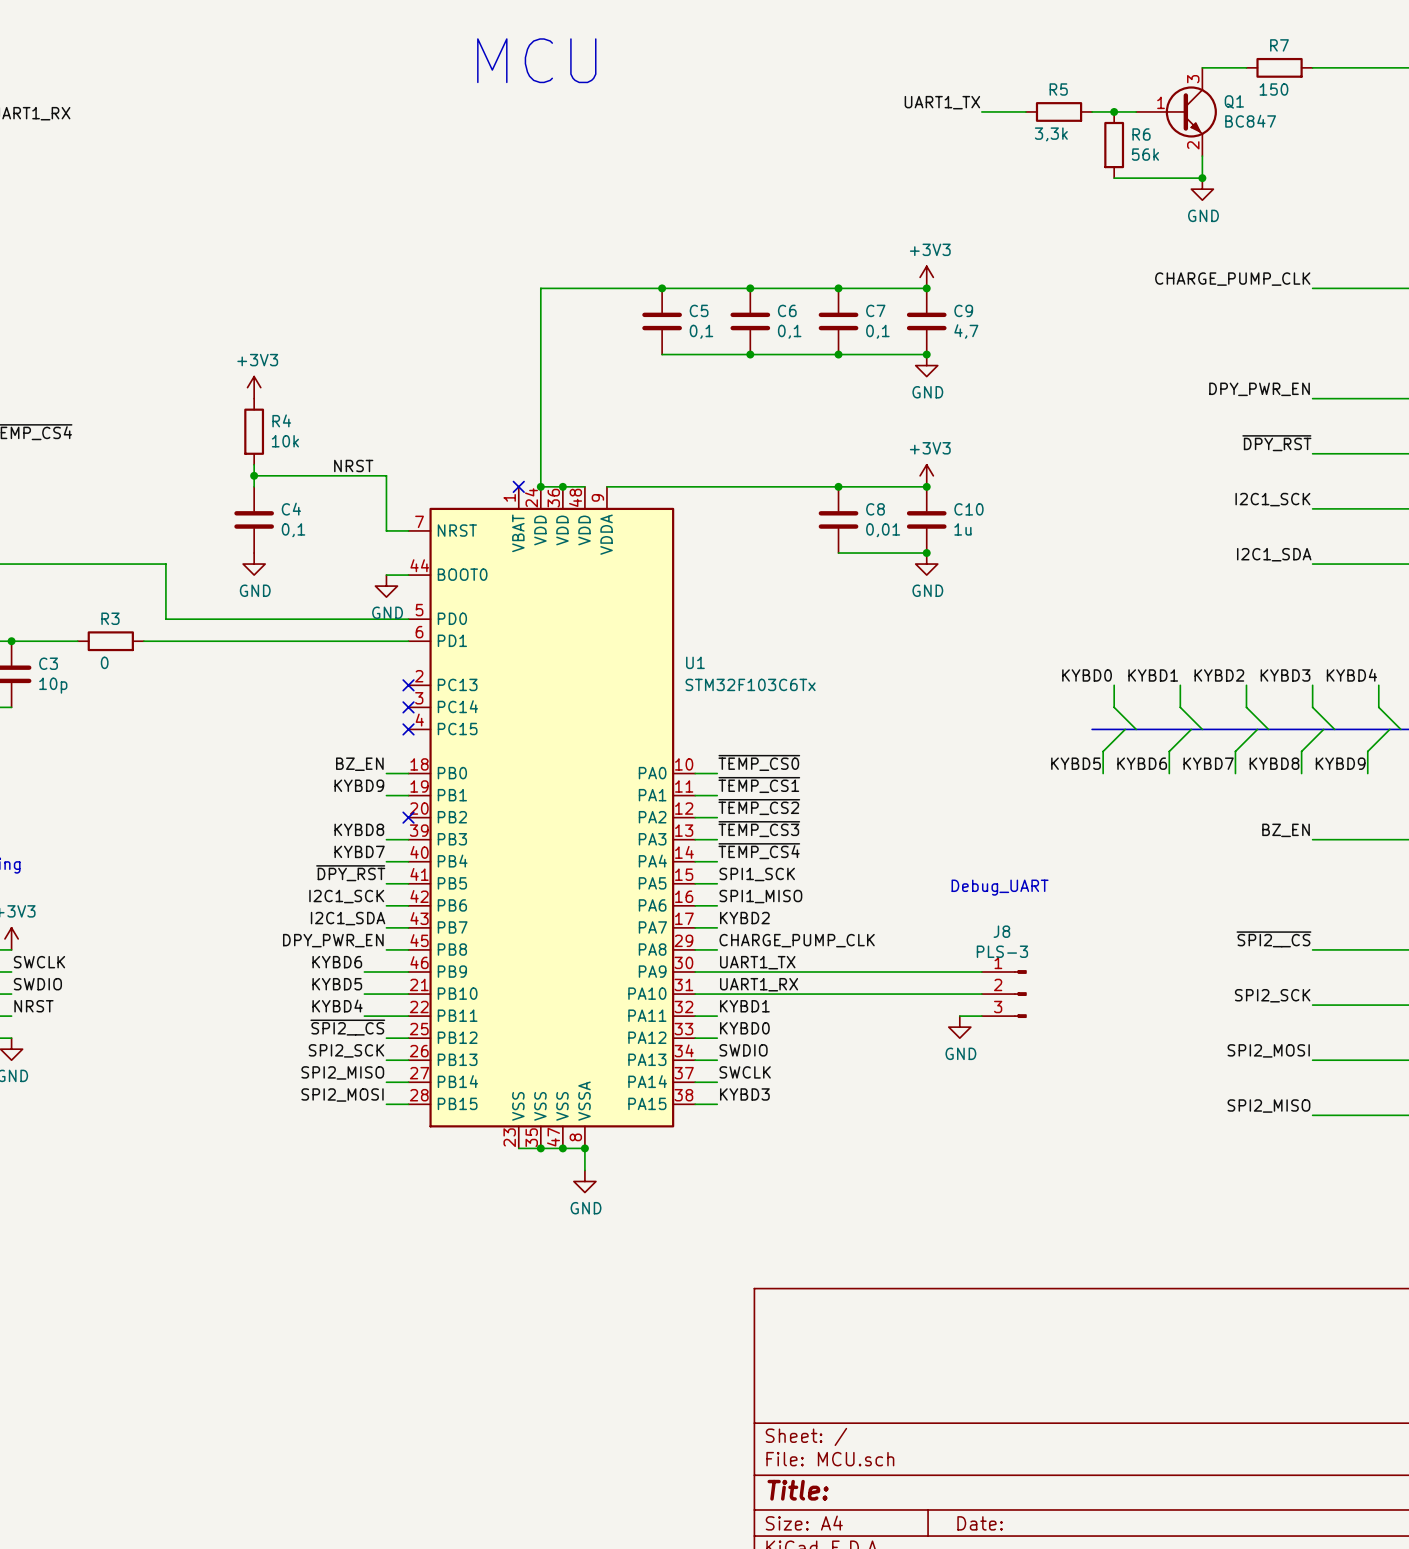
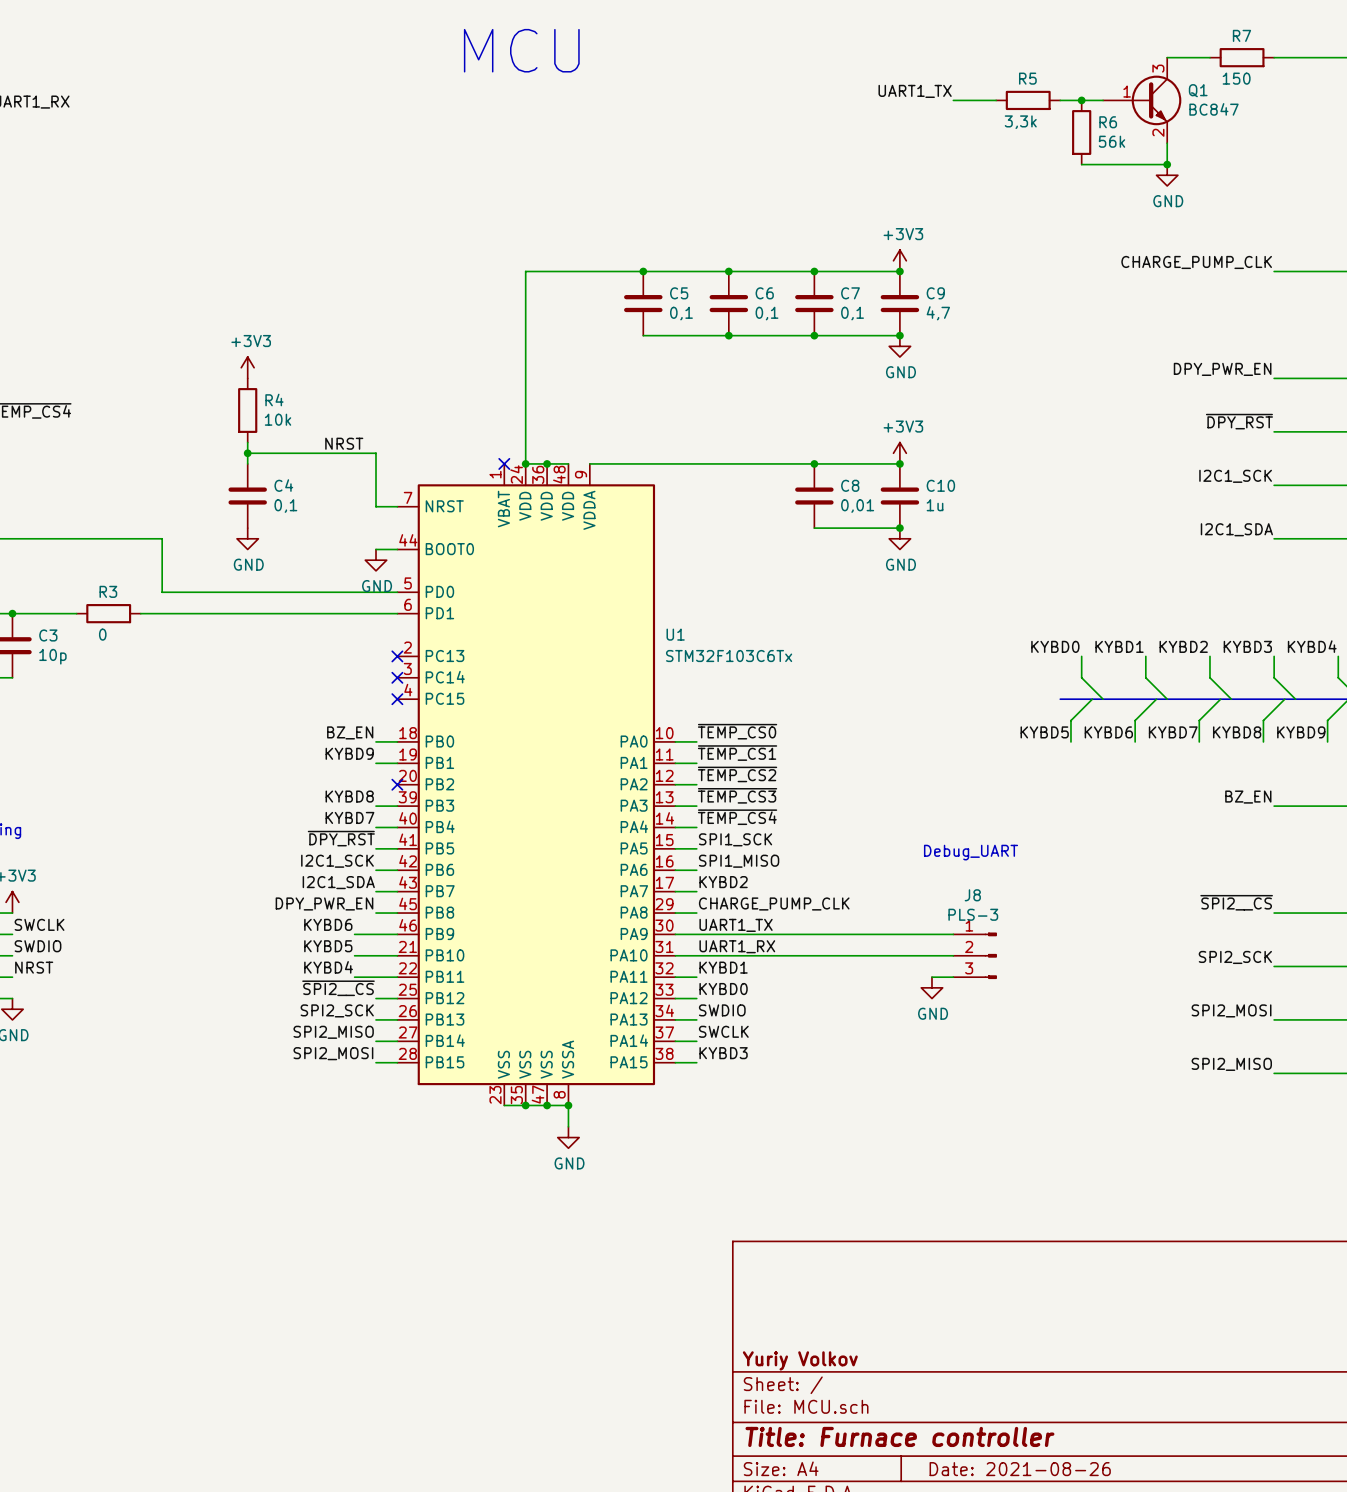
title block: none -> Yuriy Volkov (800, 1360)
title block: Title: (798, 1490) -> Title: Furnace controller (899, 1436)
title block: Date: (980, 1523) -> Date: 2021-08-26 (1020, 1469)

